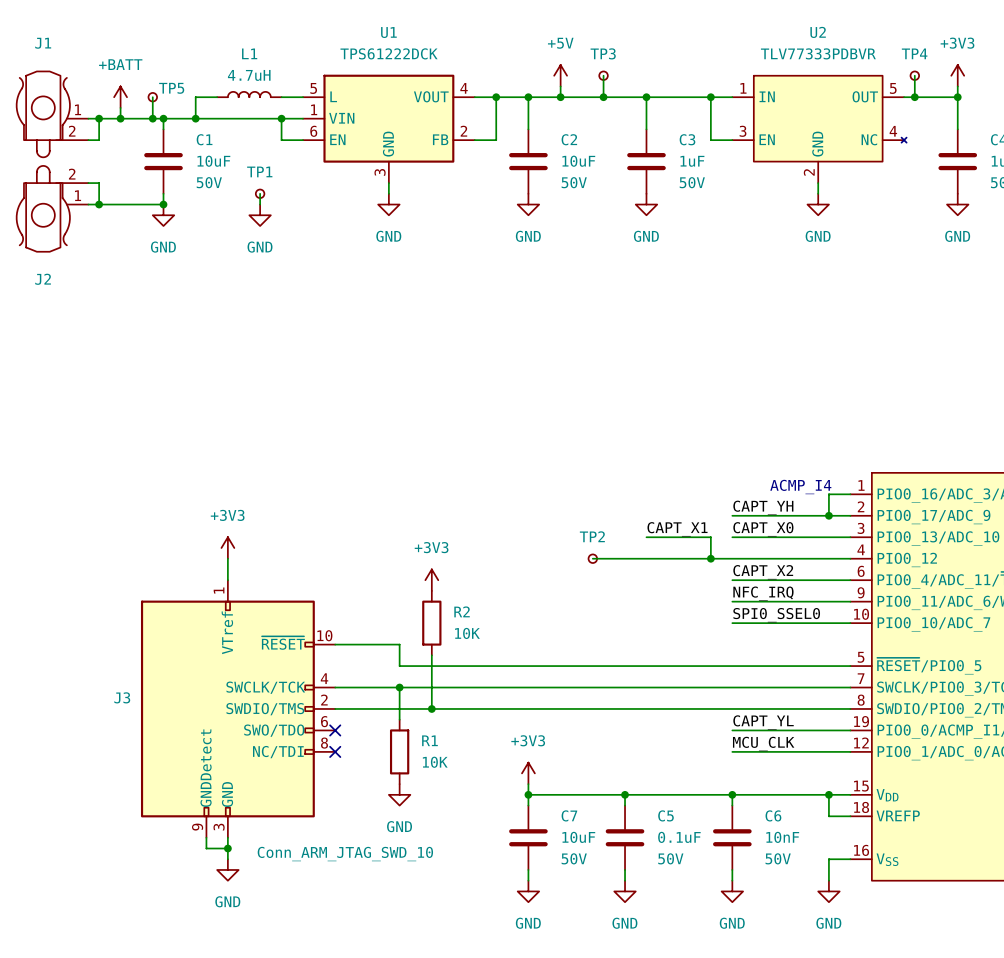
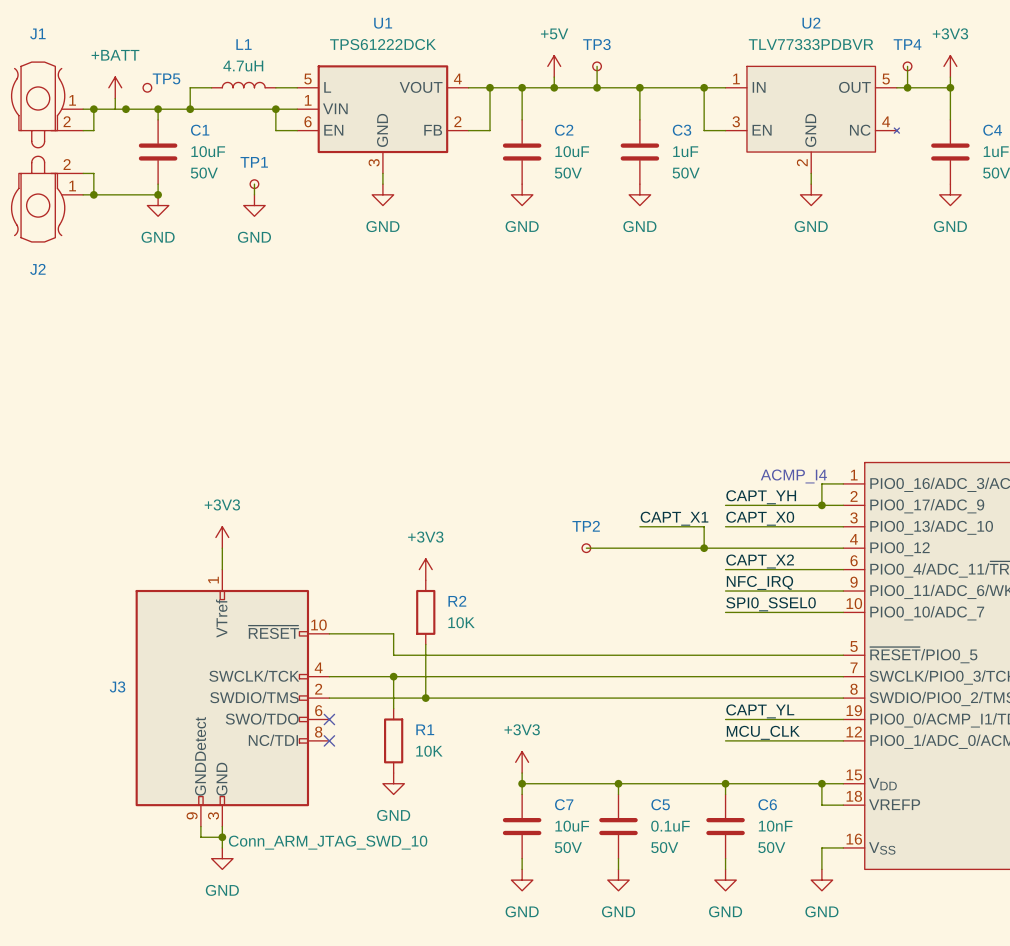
wire: (152, 97) (152, 118) -> none
junction: (120, 118) -> none
junction: none -> (125, 109)
junction: (152, 118) -> none

